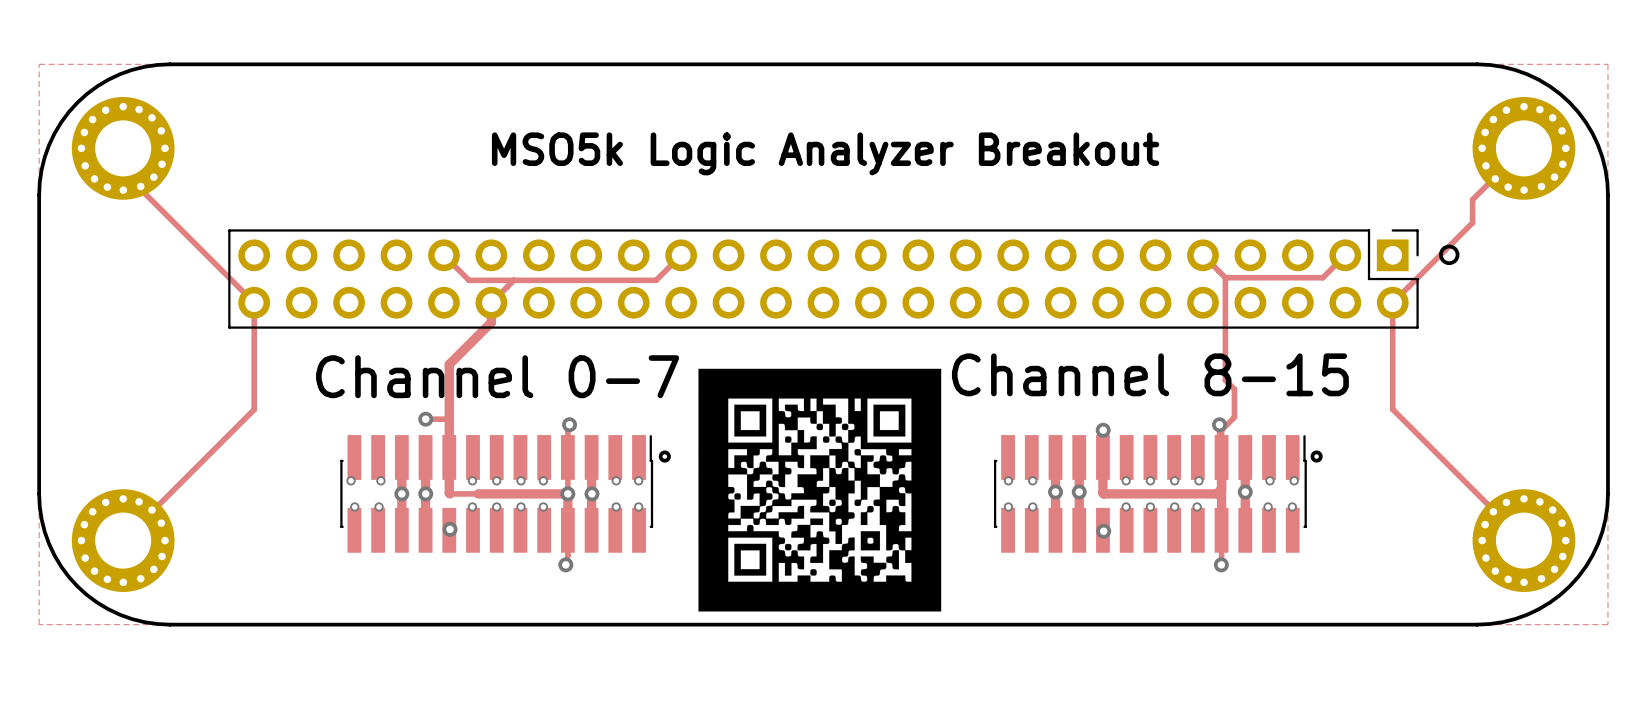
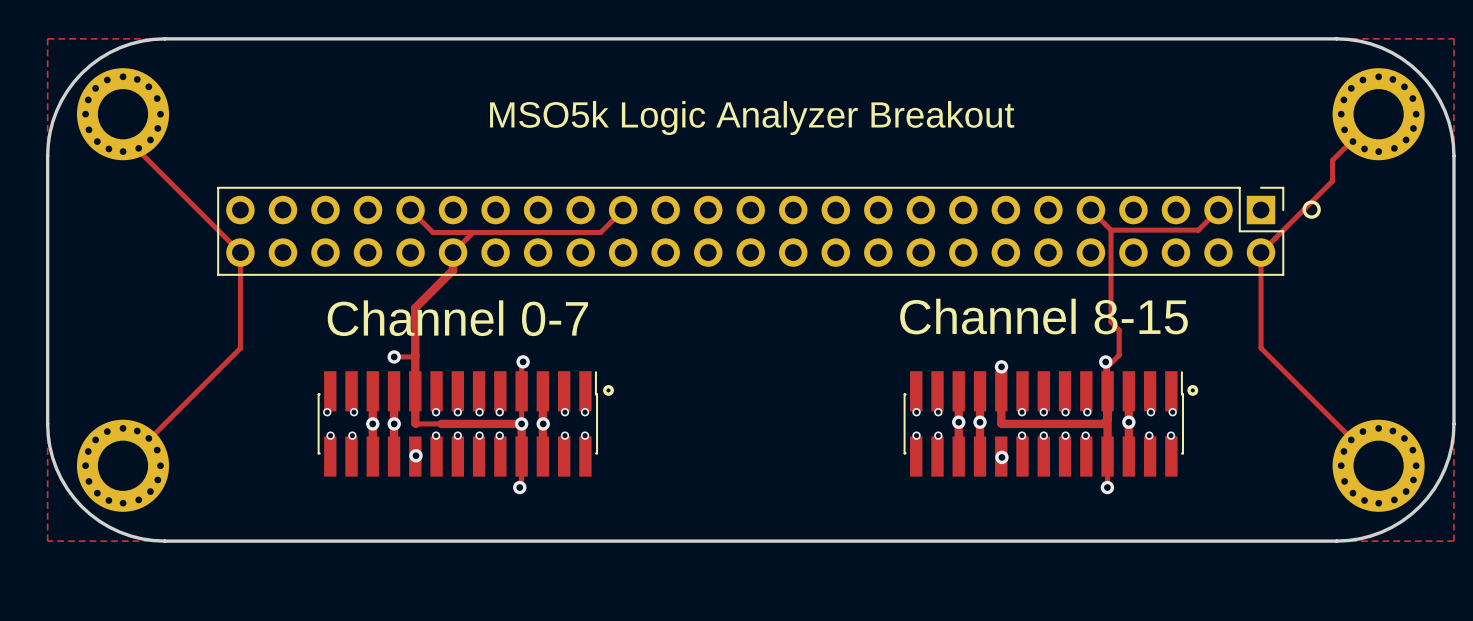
drawing: [698, 368, 942, 612] -> none

